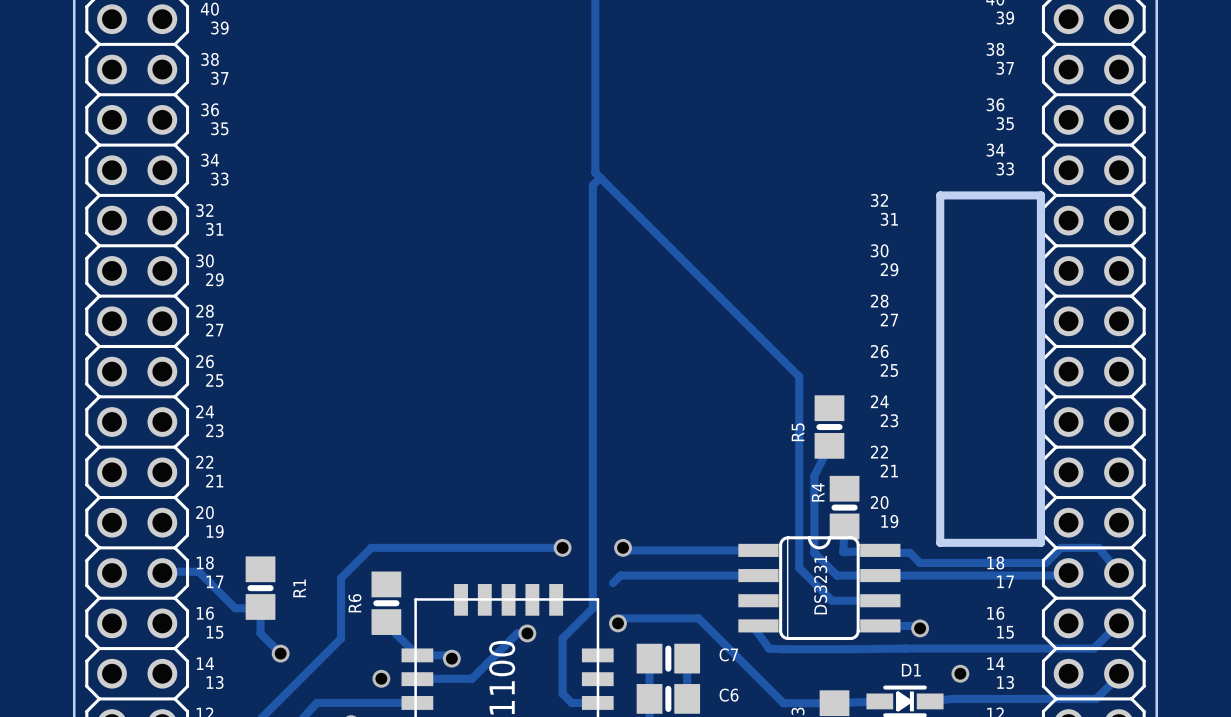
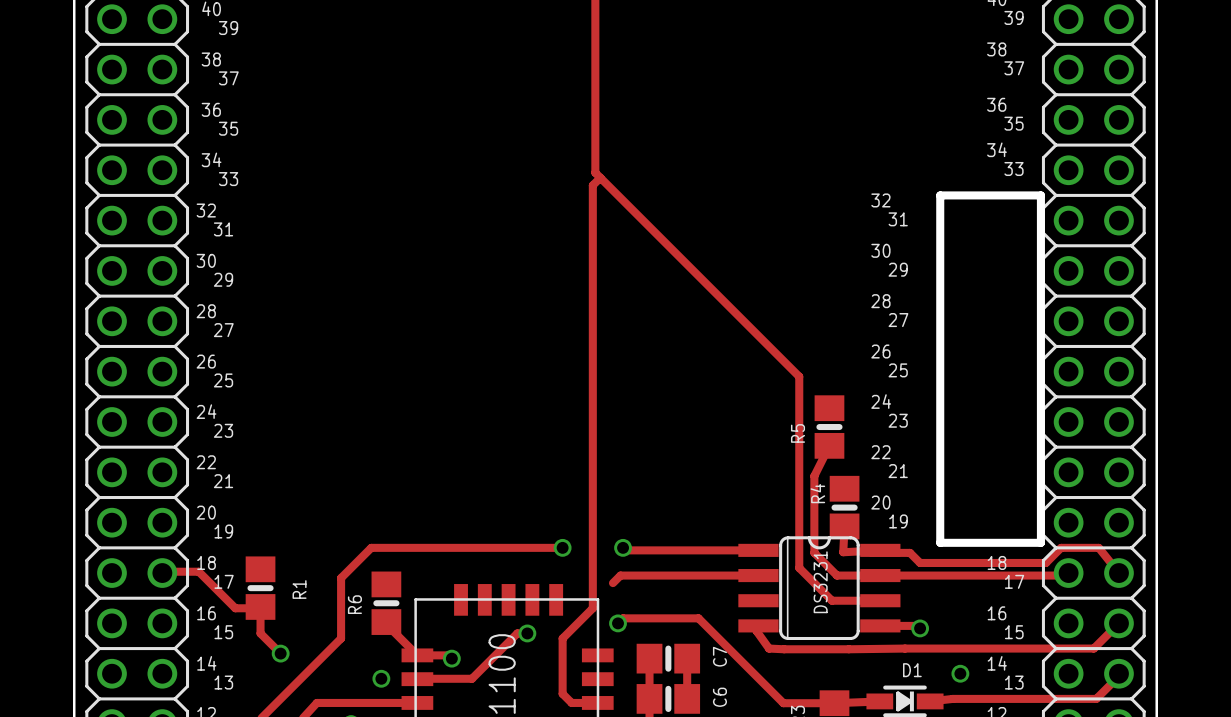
C7 name rotation: 0° (728, 654) -> 90° counterclockwise (719, 656)
C6 name rotation: 0° (729, 695) -> 90° counterclockwise (719, 697)

